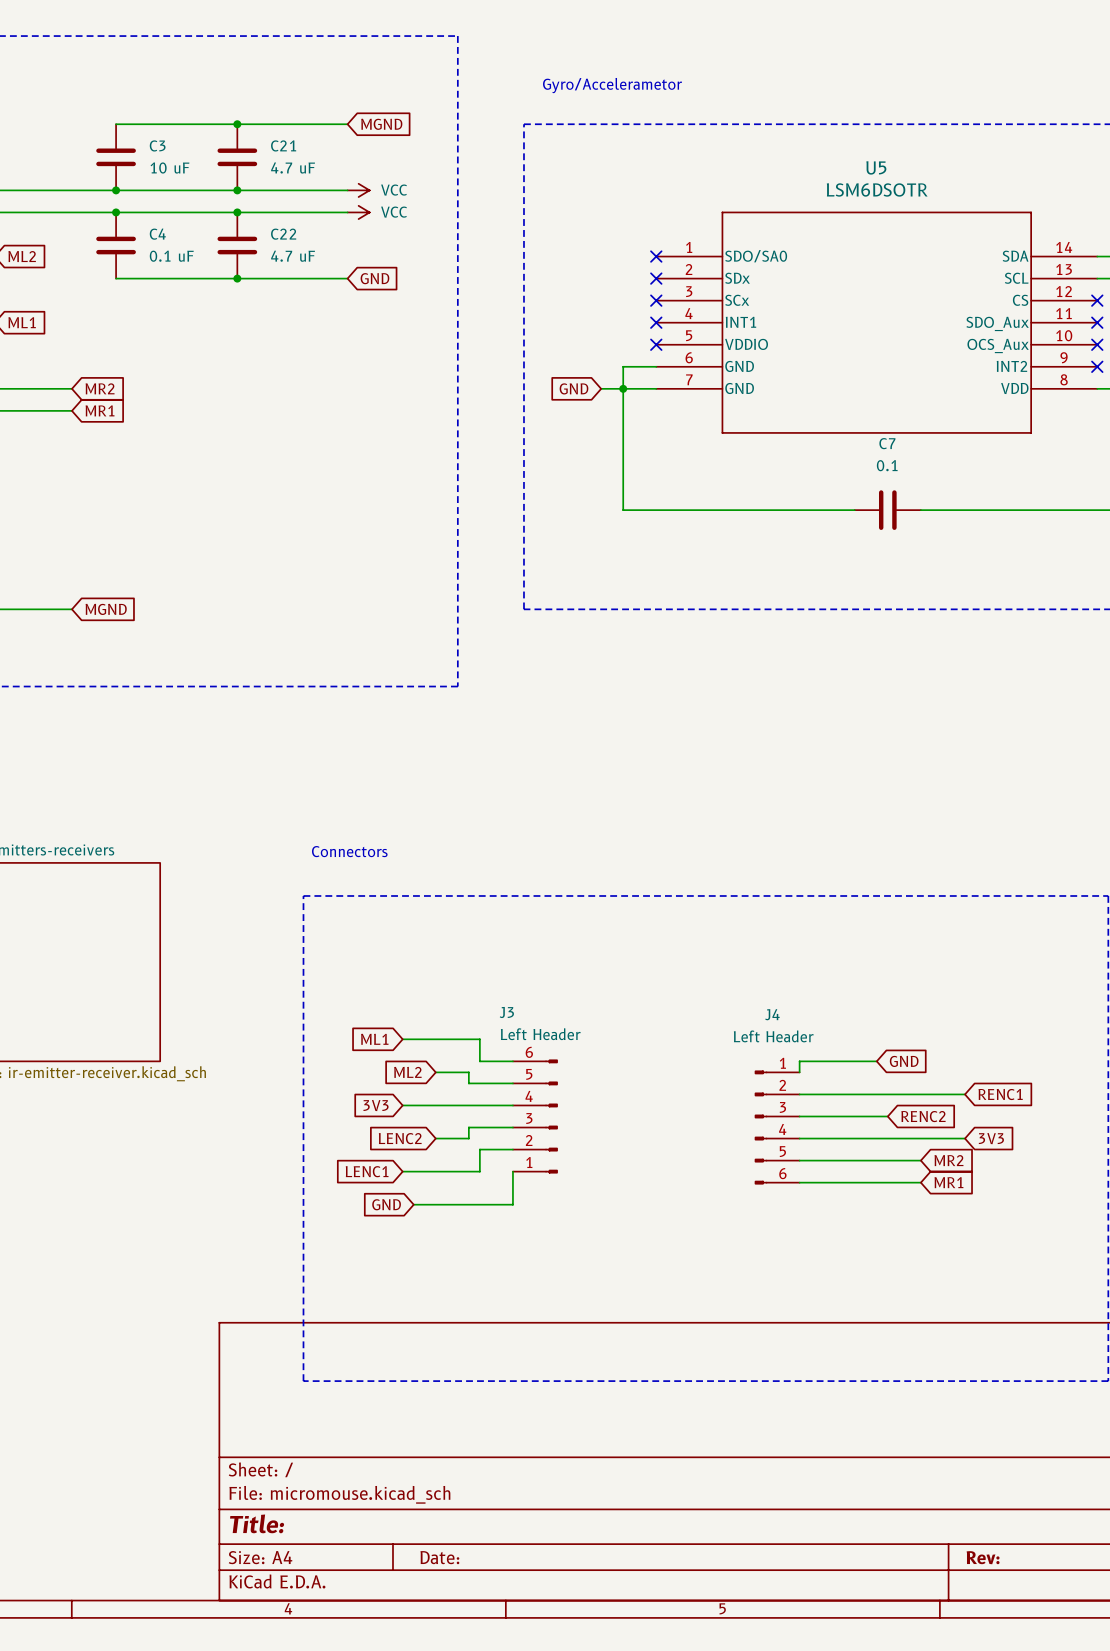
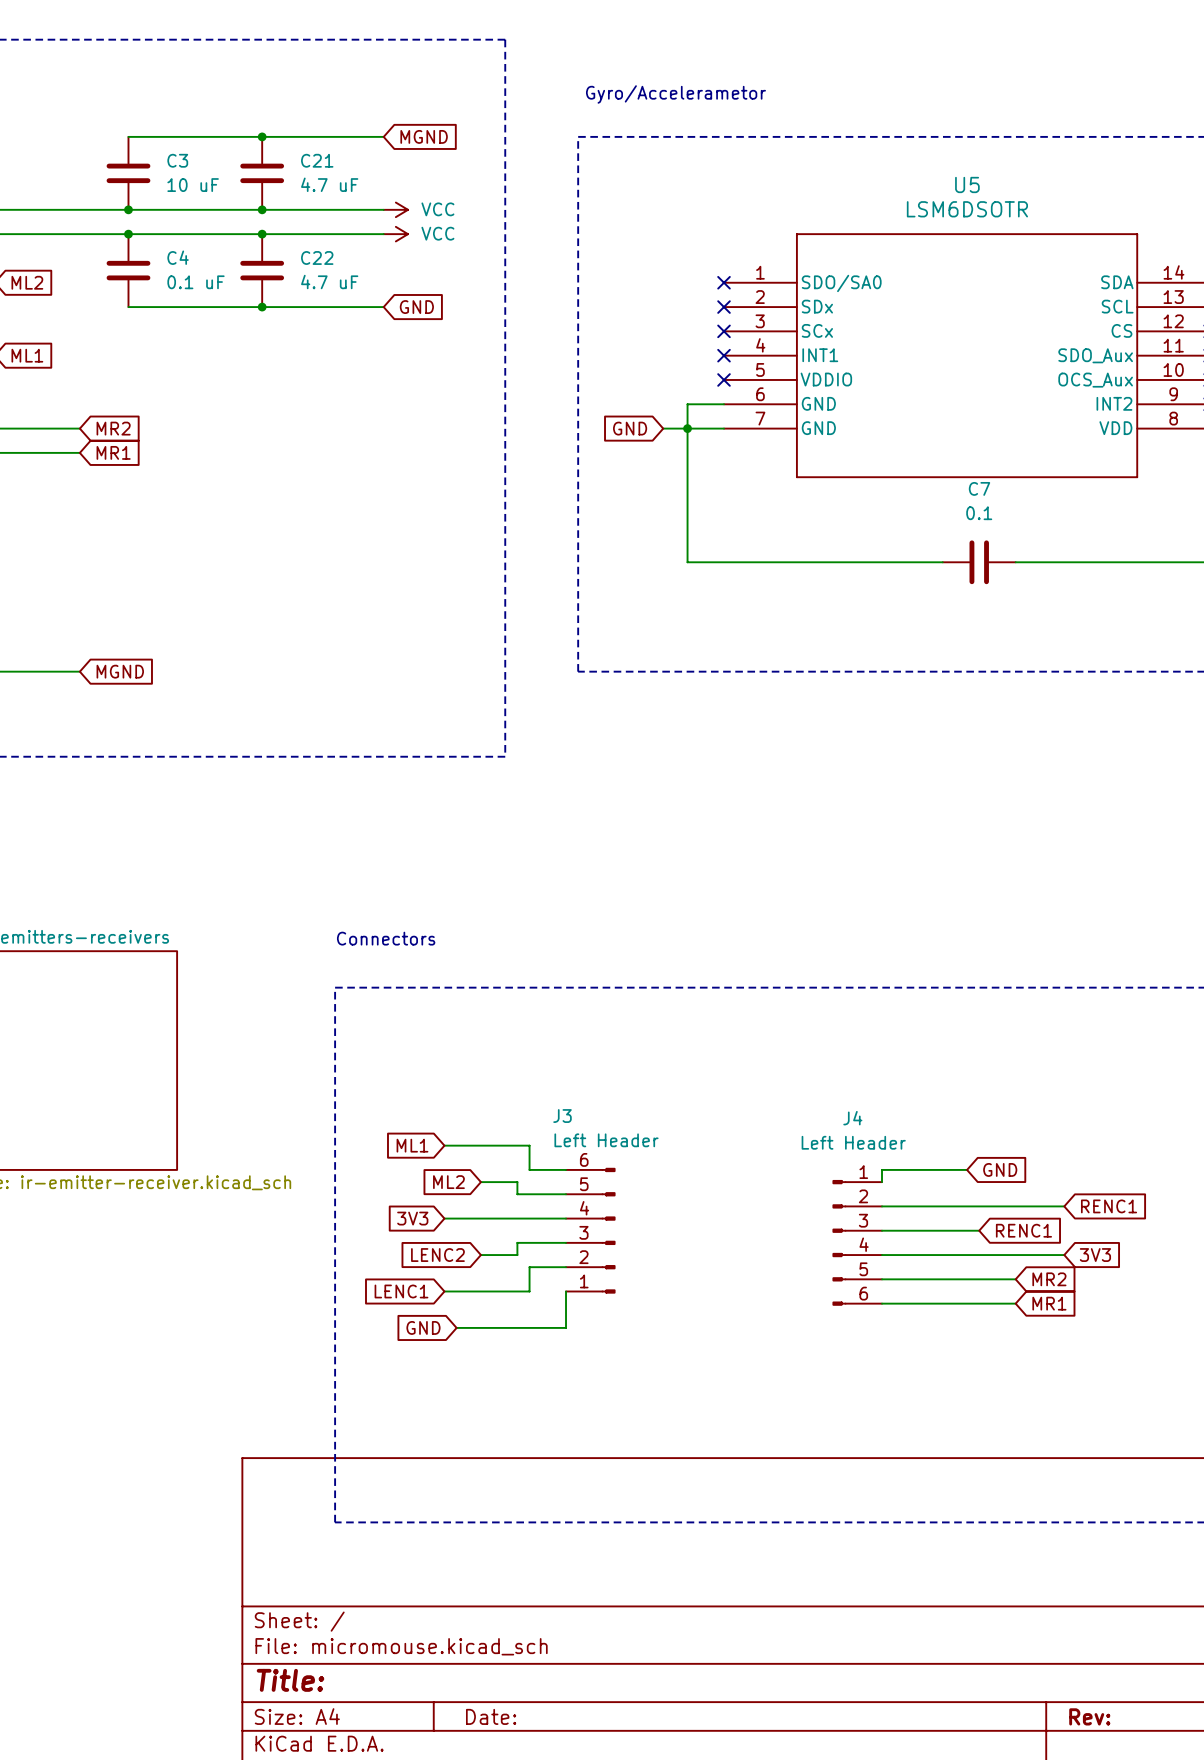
global label: RENC2 (923, 1116) -> RENC1 (1023, 1230)

